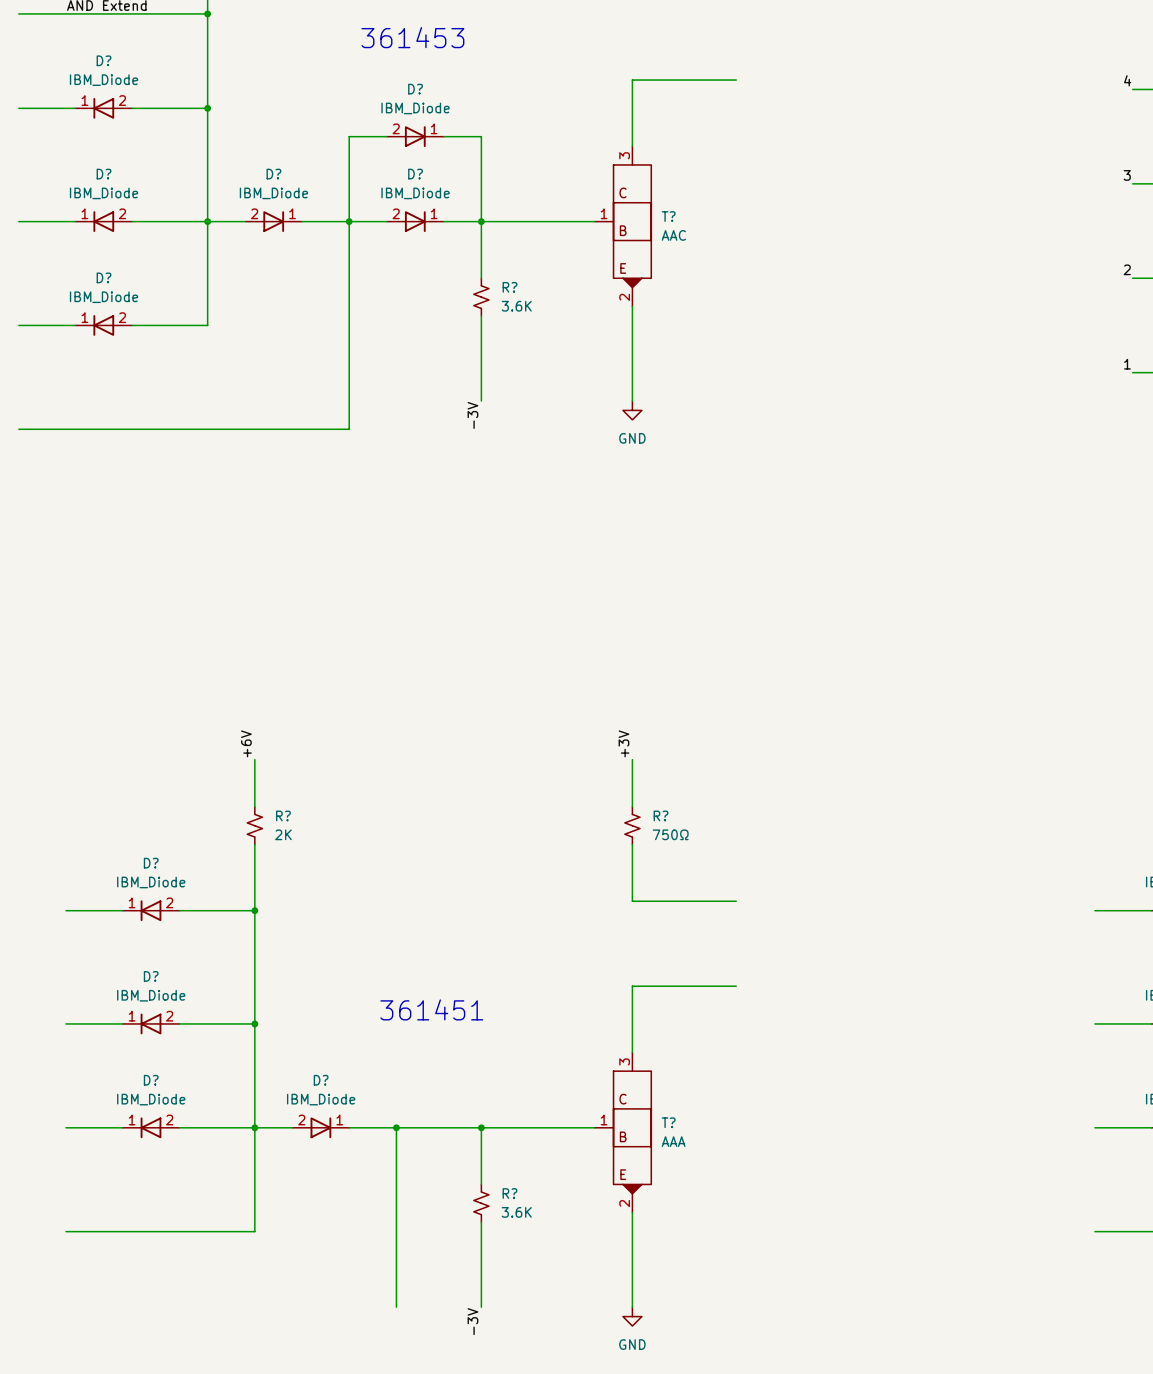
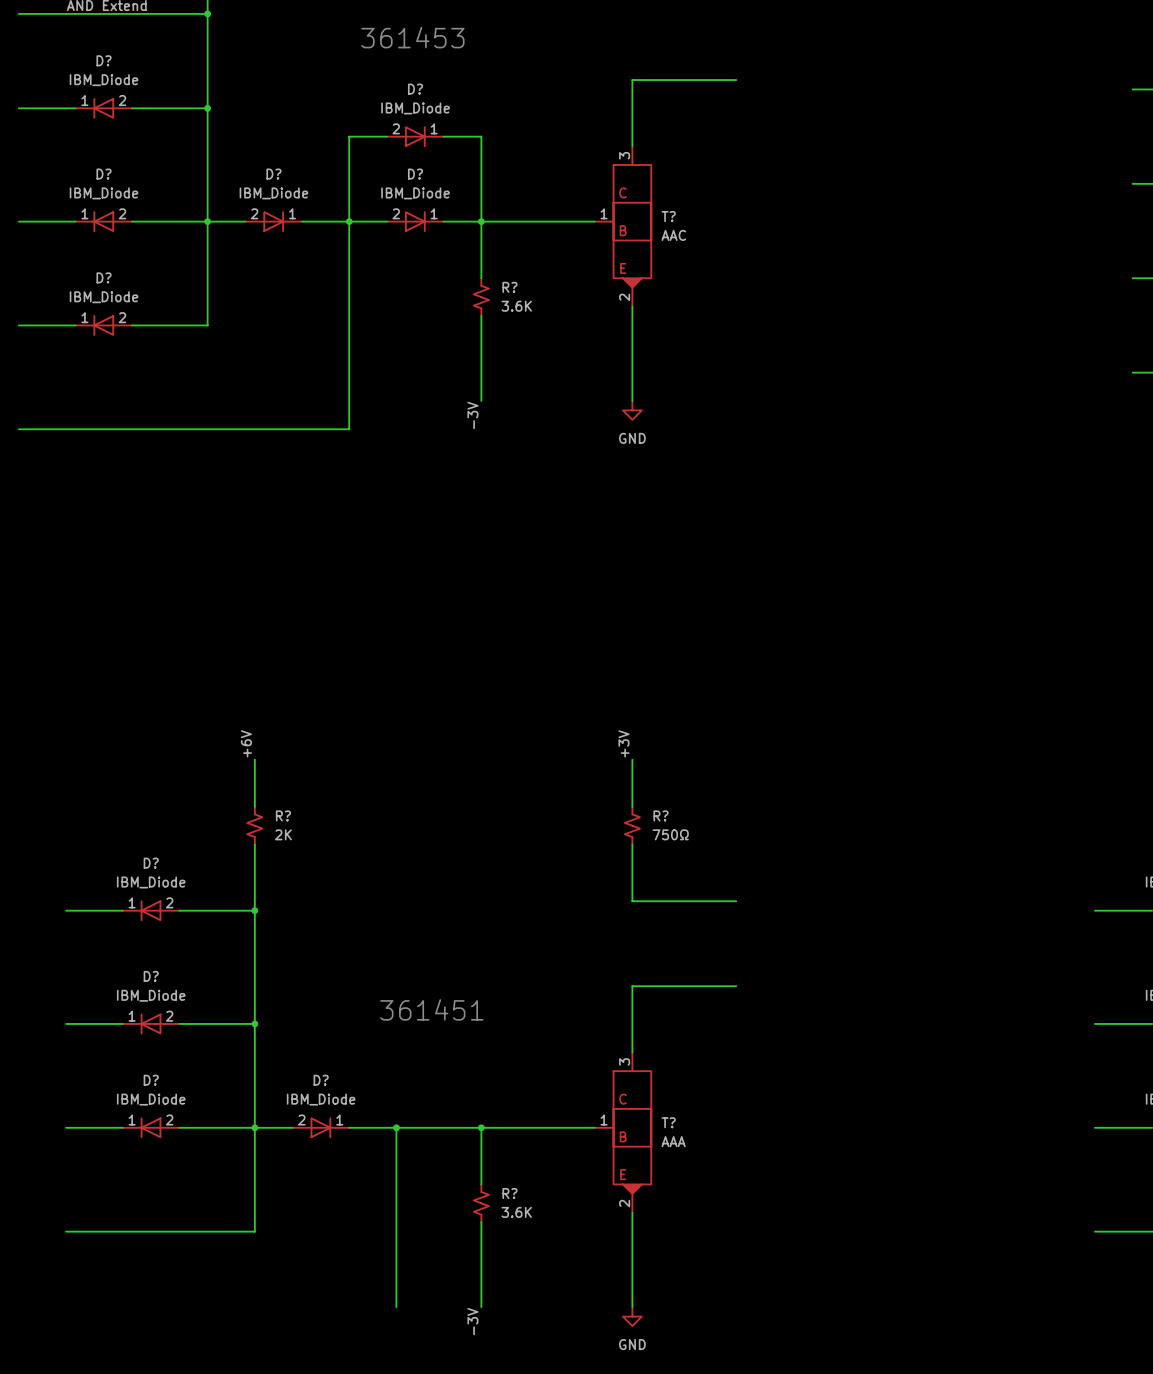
label: 4 (1127, 80) -> none
label: 3 (1127, 175) -> none
label: 2 (1127, 269) -> none
label: 1 (1127, 364) -> none

